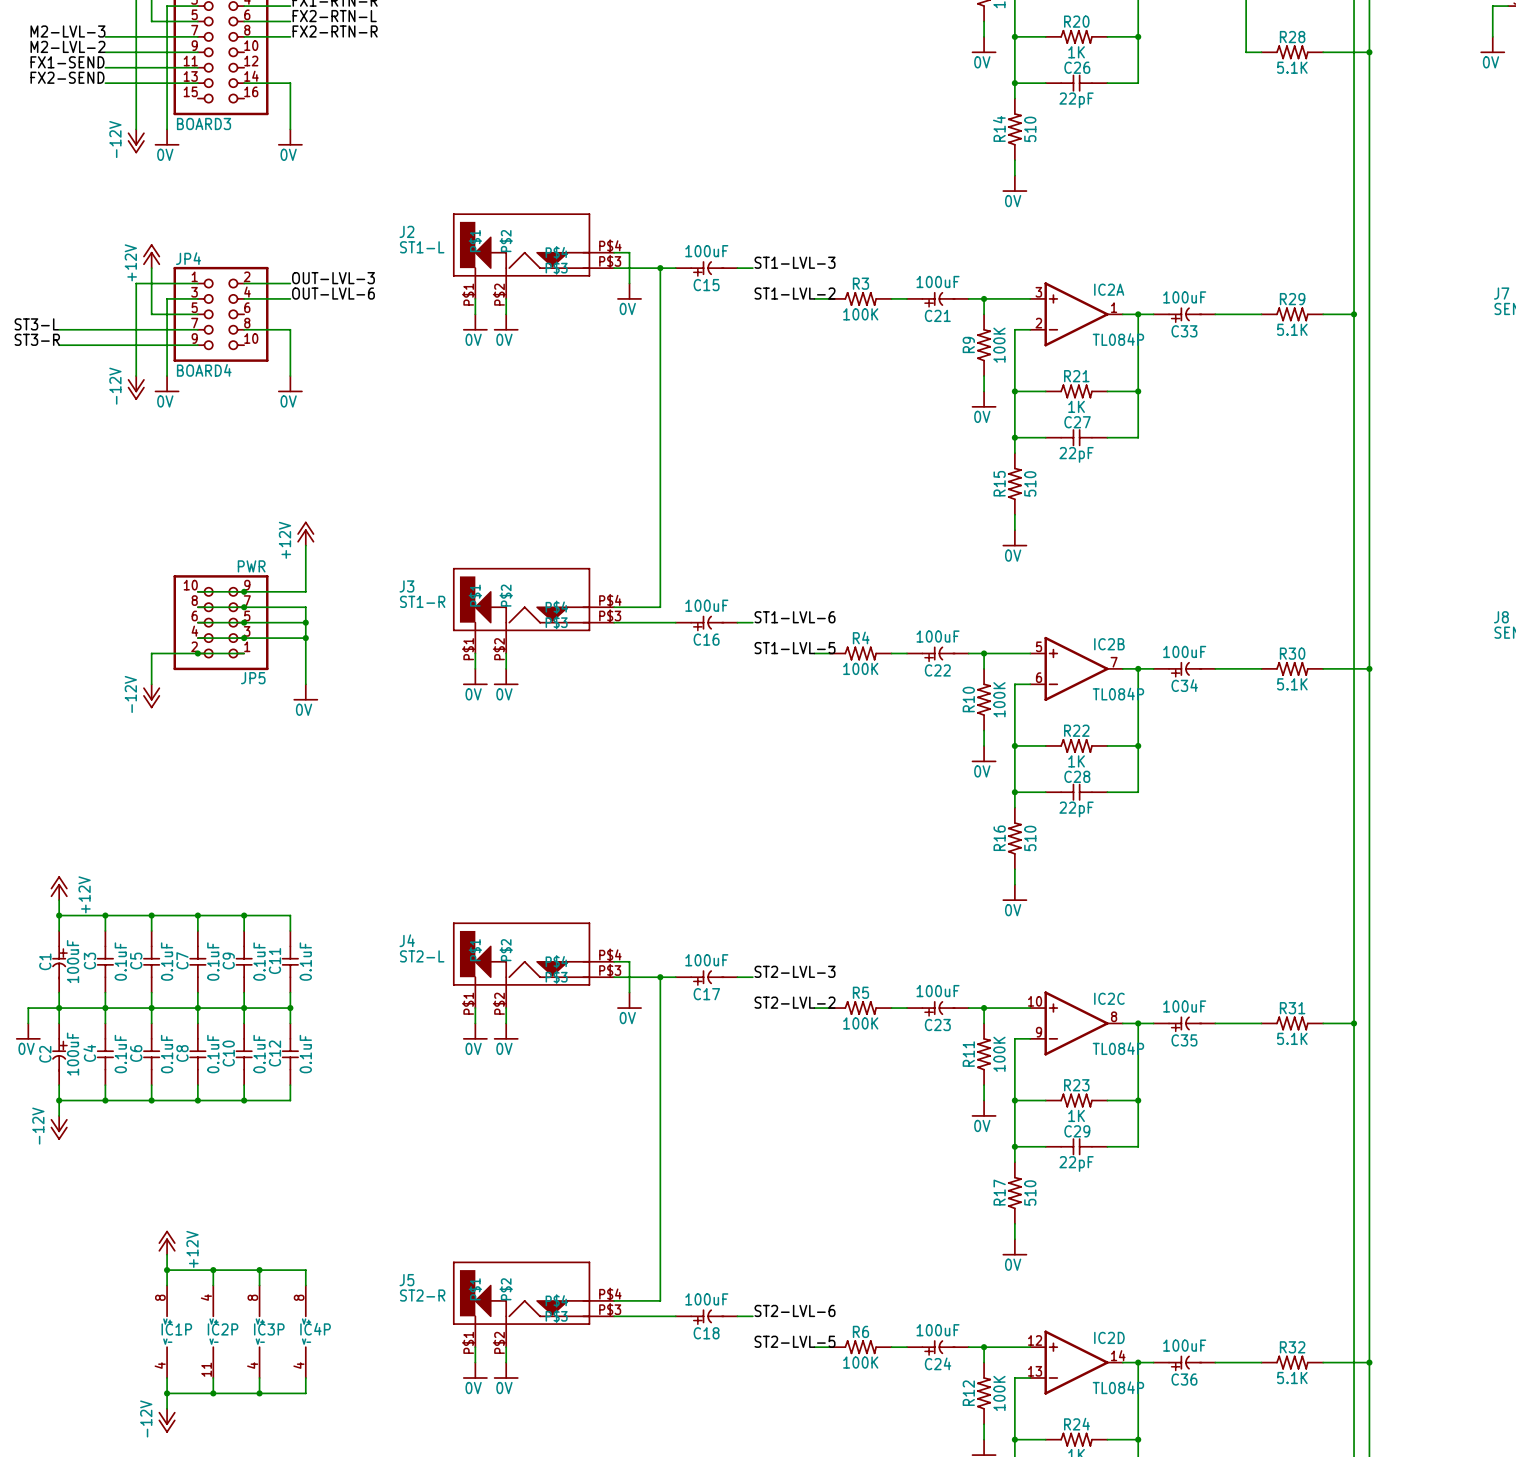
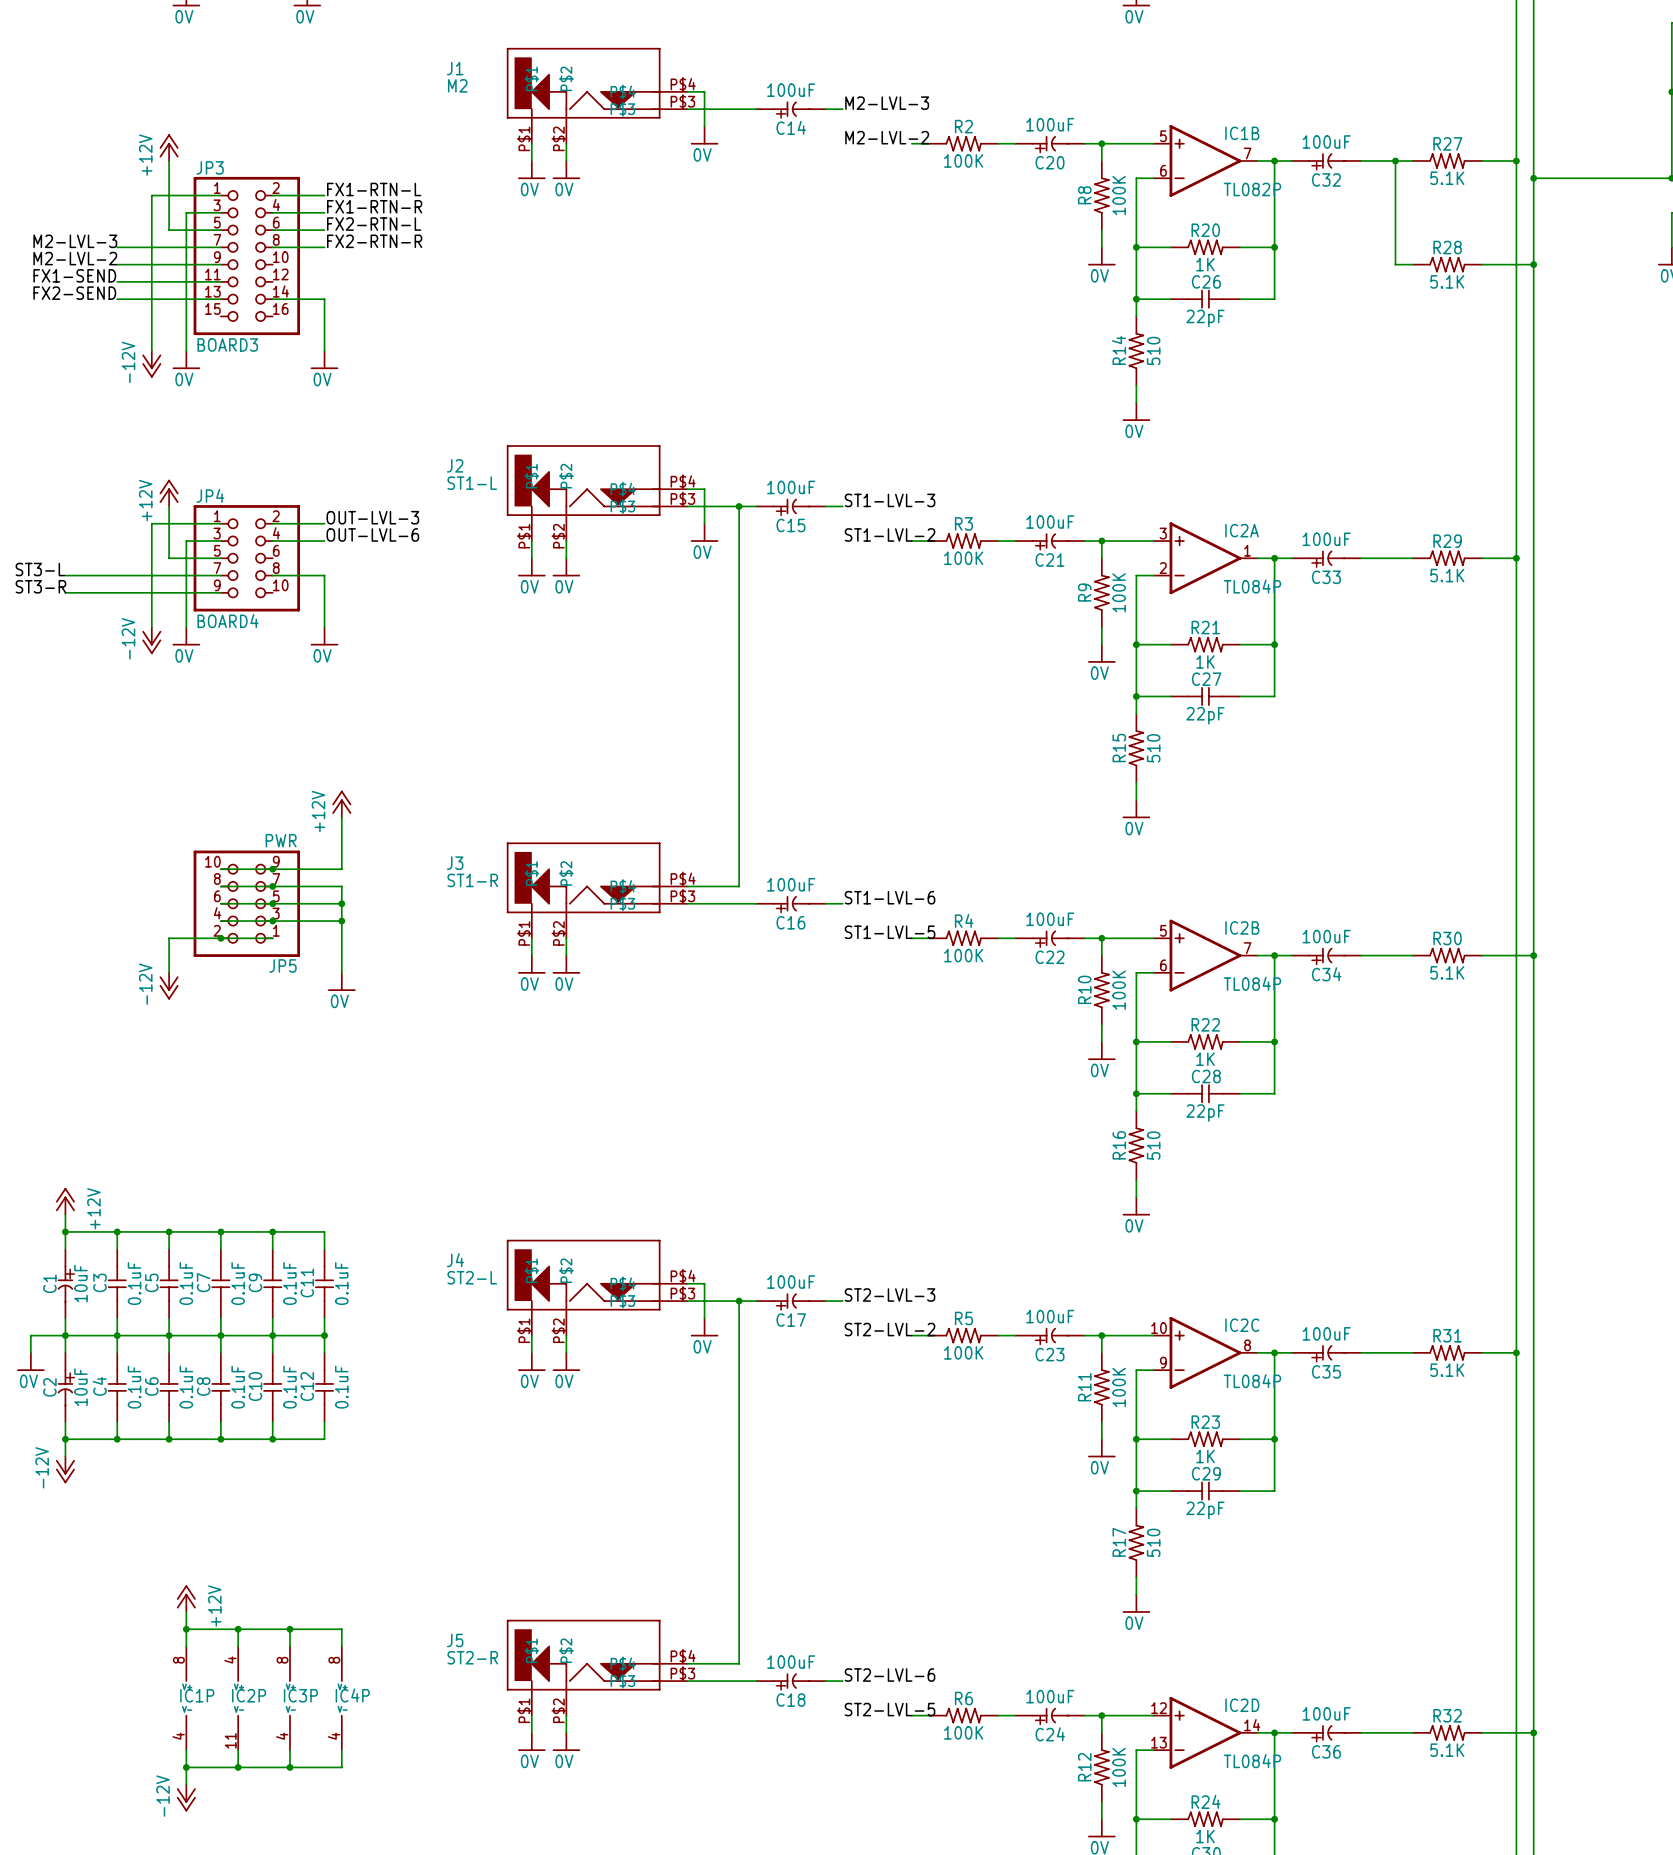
C1 value: 100uF (73, 961) -> 10uF (80, 1283)
C2 value: 100uF (73, 1054) -> 10uF (80, 1387)

